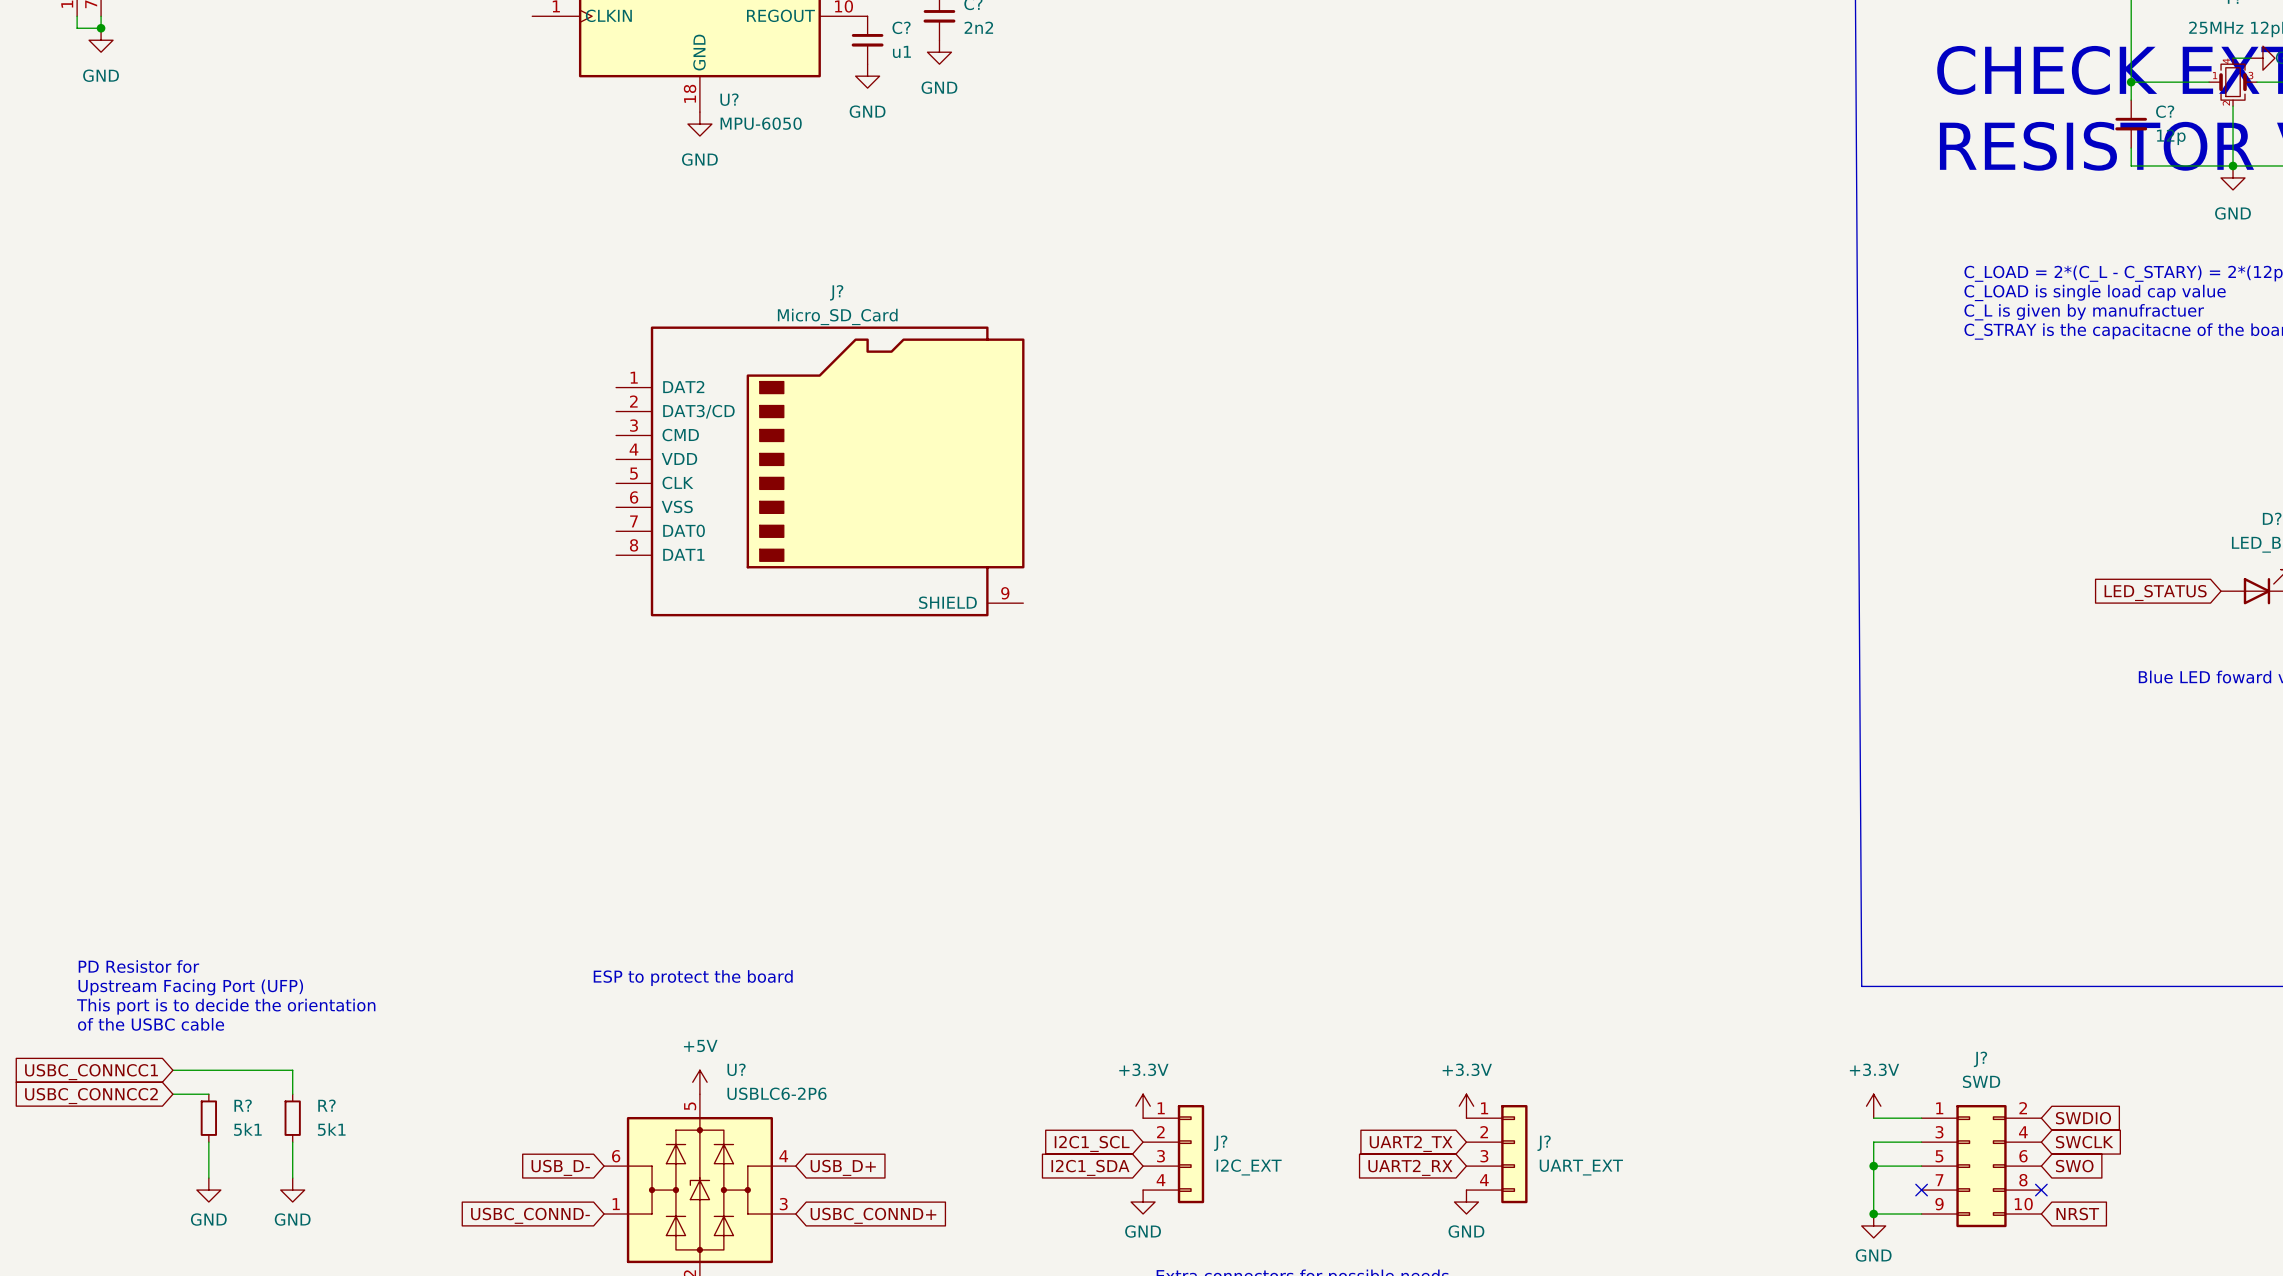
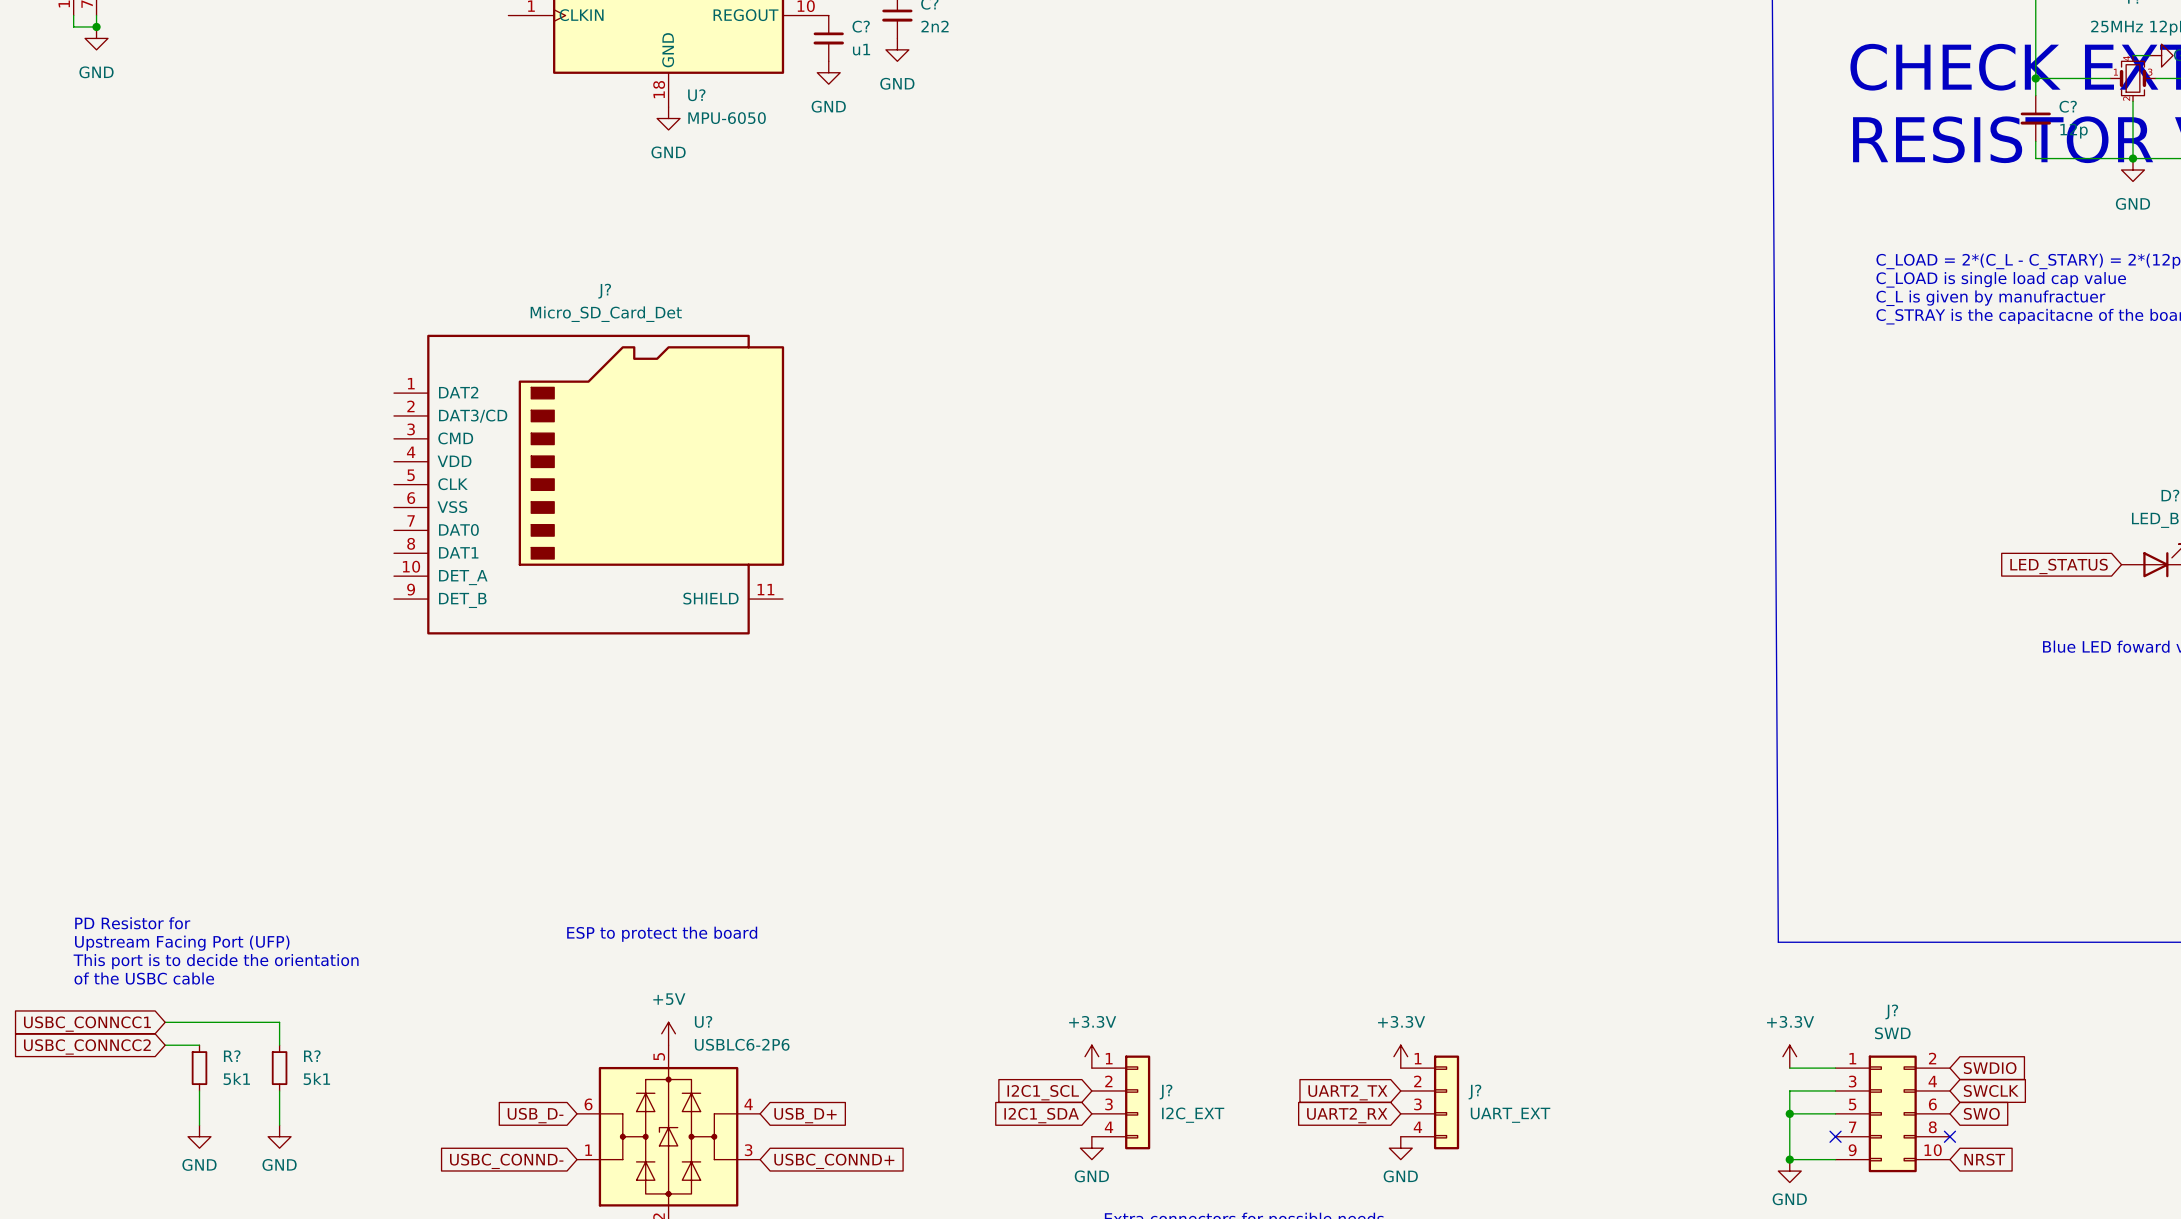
J?: Micro_SD_Card (820, 471) -> none
J?: none -> Micro_SD_Card_Det (589, 484)

